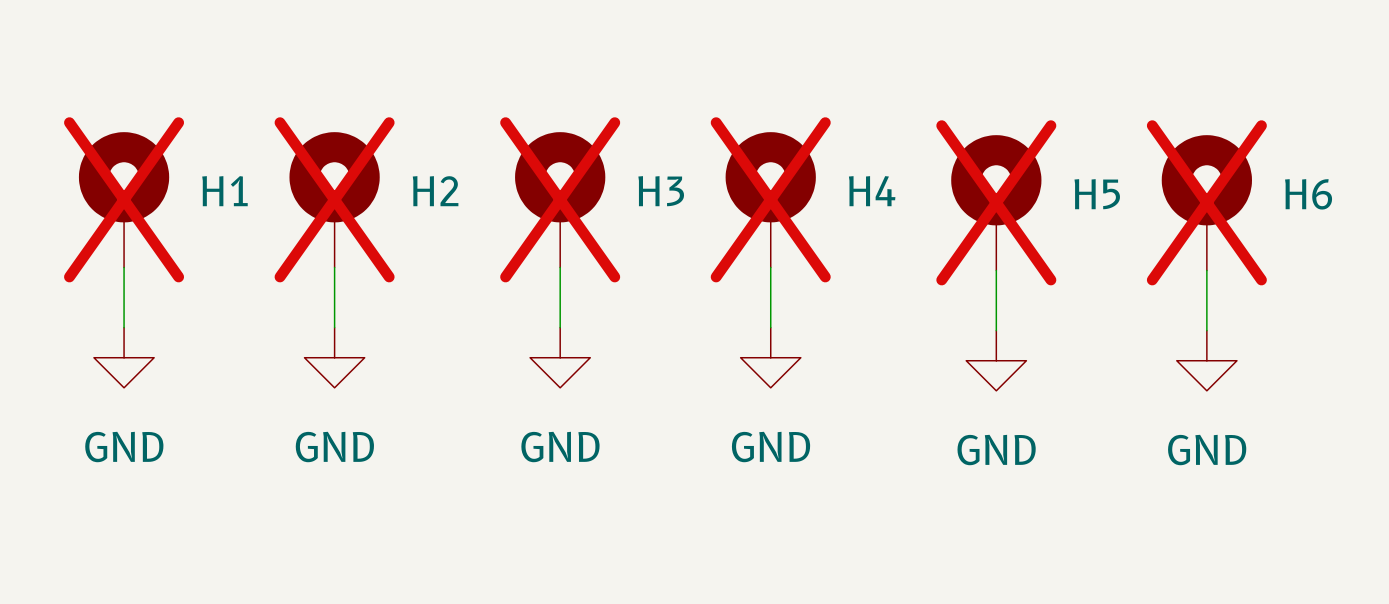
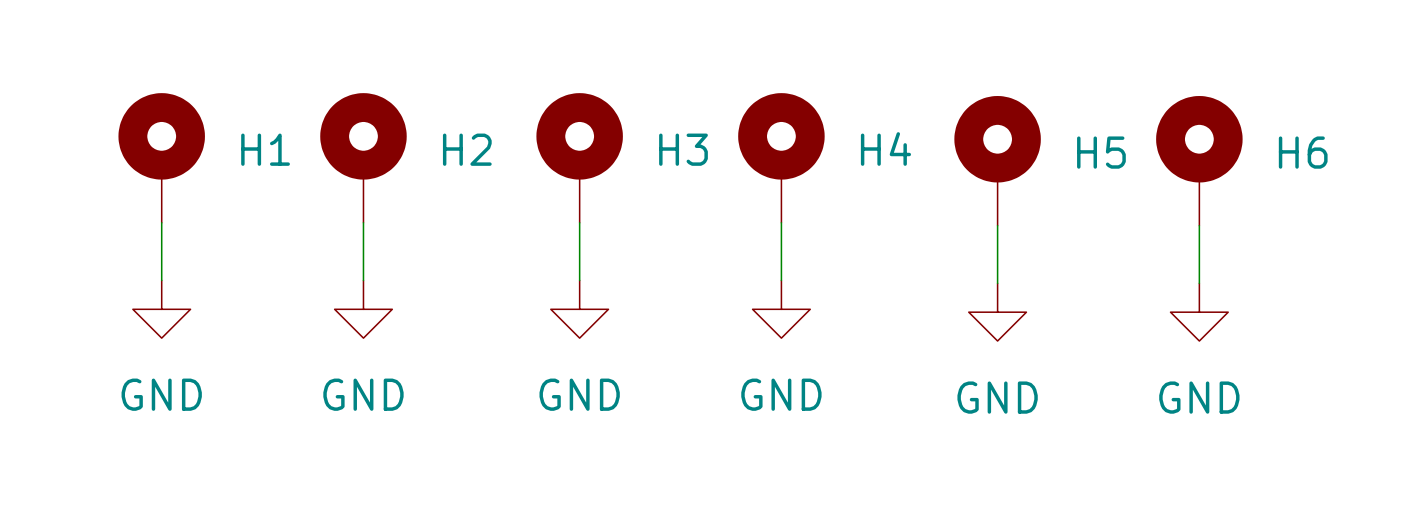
H1 do-not-place cross: (124, 199) -> none
H2 do-not-place cross: (334, 199) -> none
H3 do-not-place cross: (560, 199) -> none
H4 do-not-place cross: (770, 199) -> none
H5 do-not-place cross: (996, 202) -> none
H6 do-not-place cross: (1206, 202) -> none

